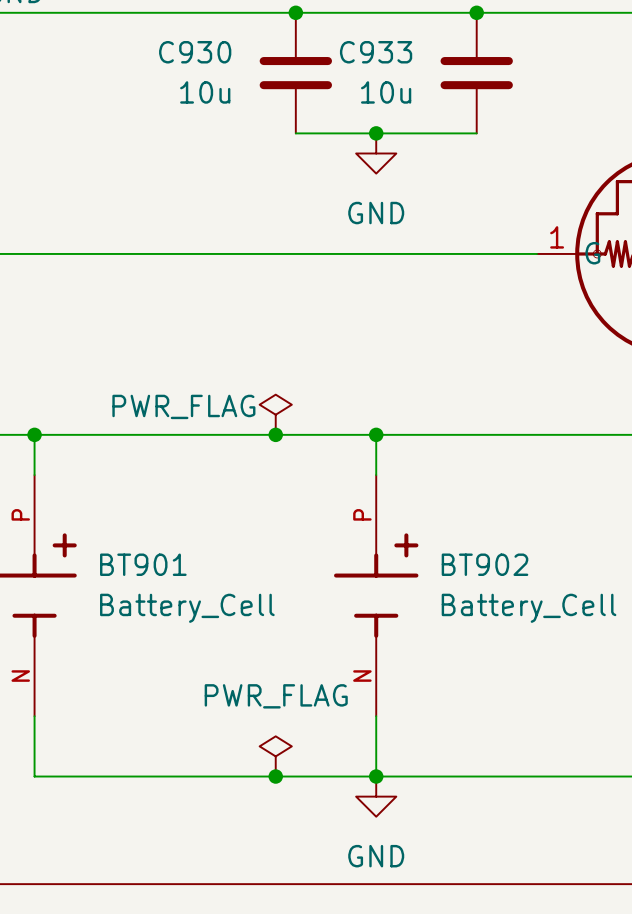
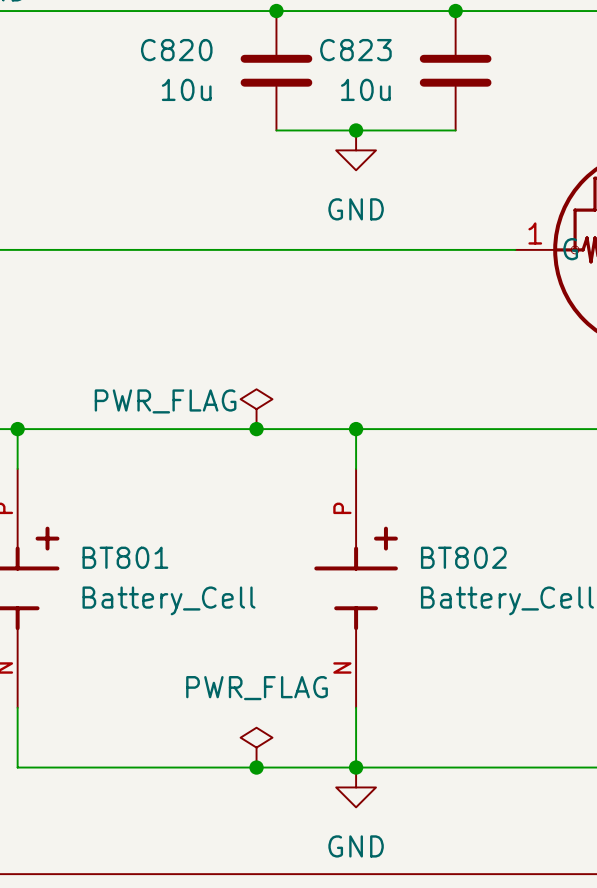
C930 name: C930 (195, 52) -> C820 (176, 50)
C933 name: C933 (376, 52) -> C823 (355, 50)
BT901 name: BT901 (143, 564) -> BT801 (125, 557)
BT902 name: BT902 (485, 564) -> BT802 (463, 557)

